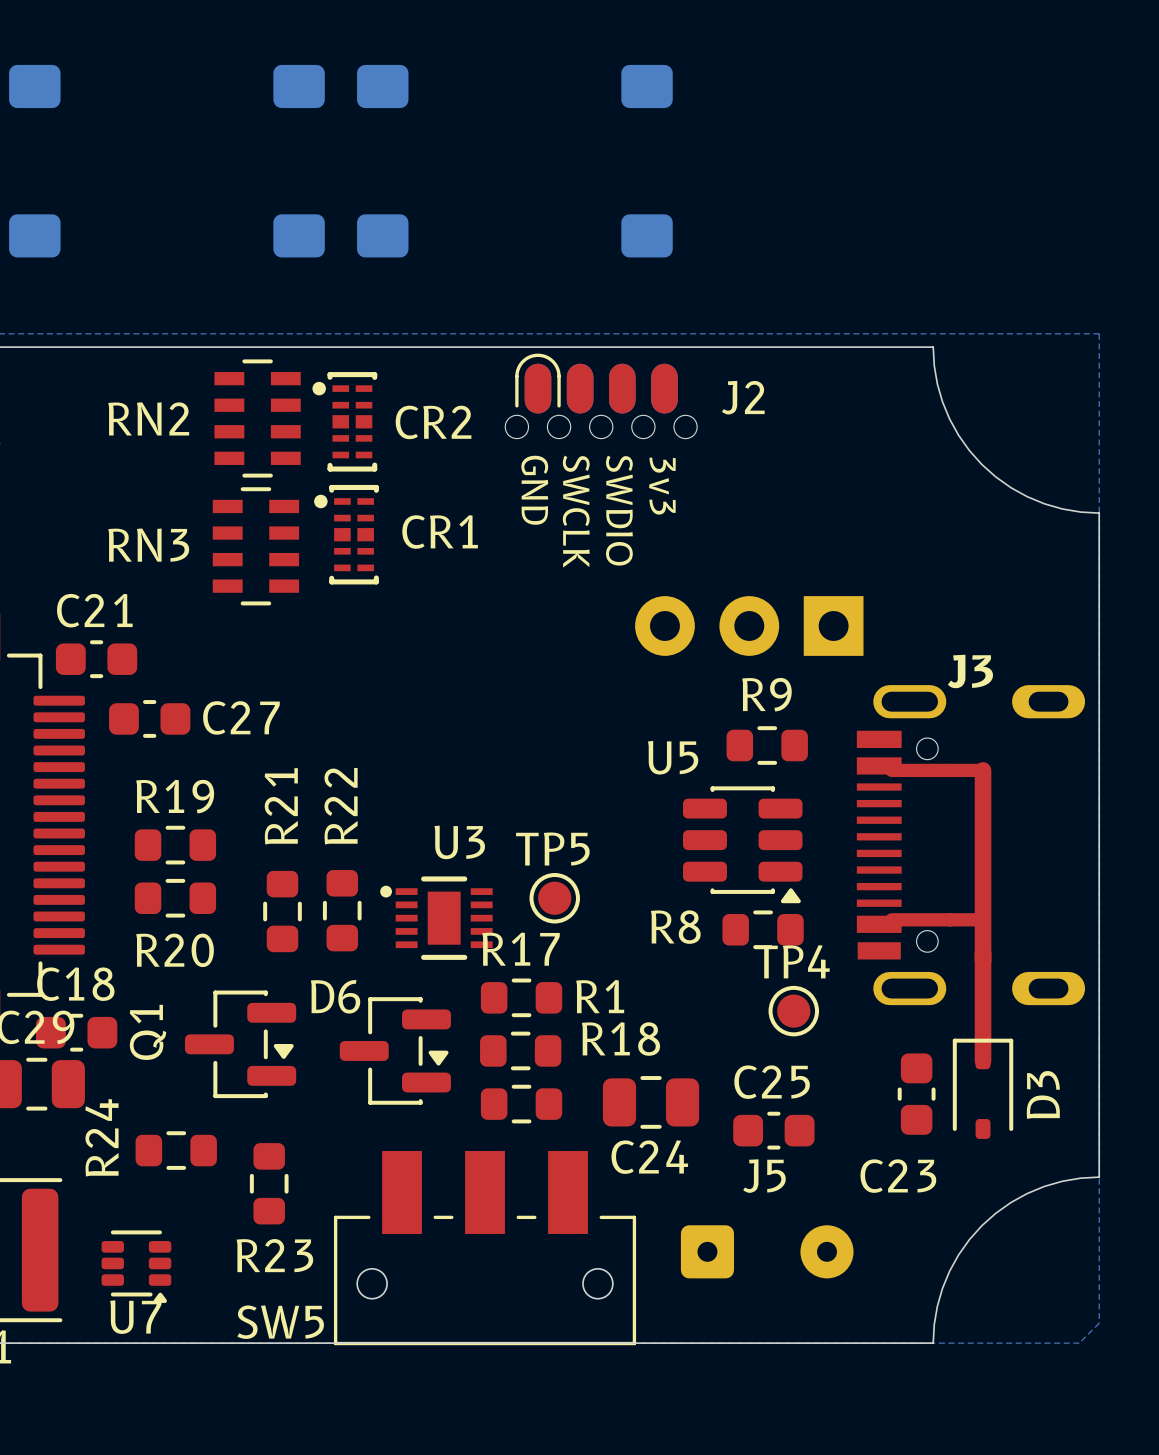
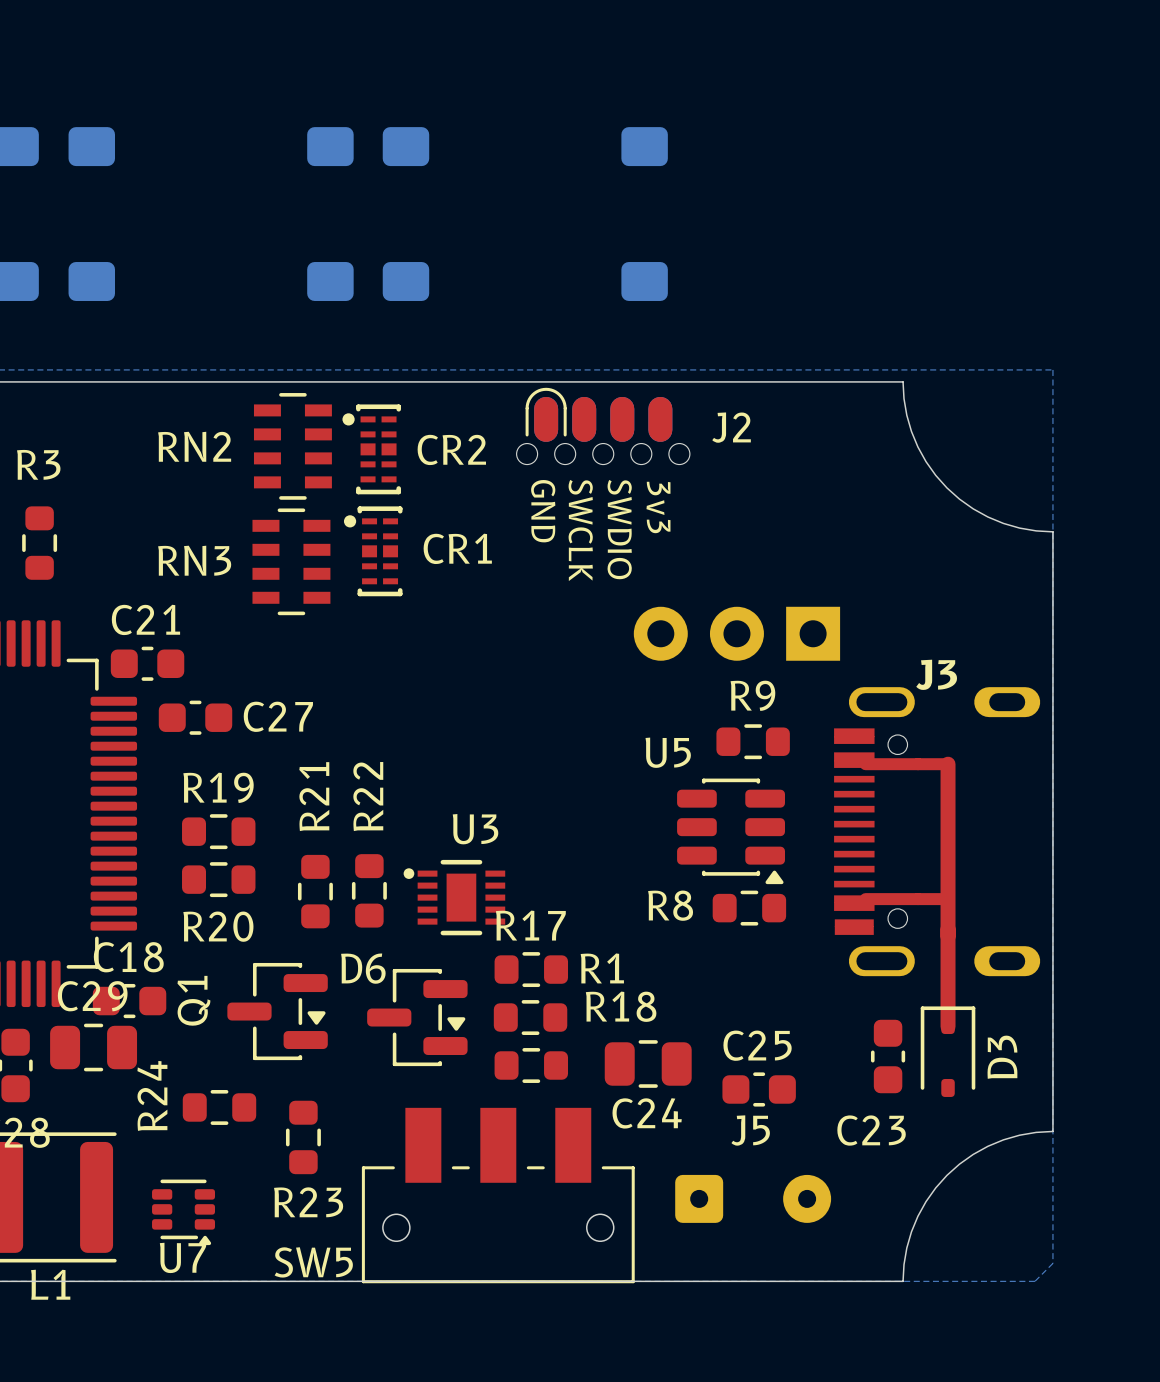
TP5: (554, 898) -> none
TP4: (793, 1011) -> none

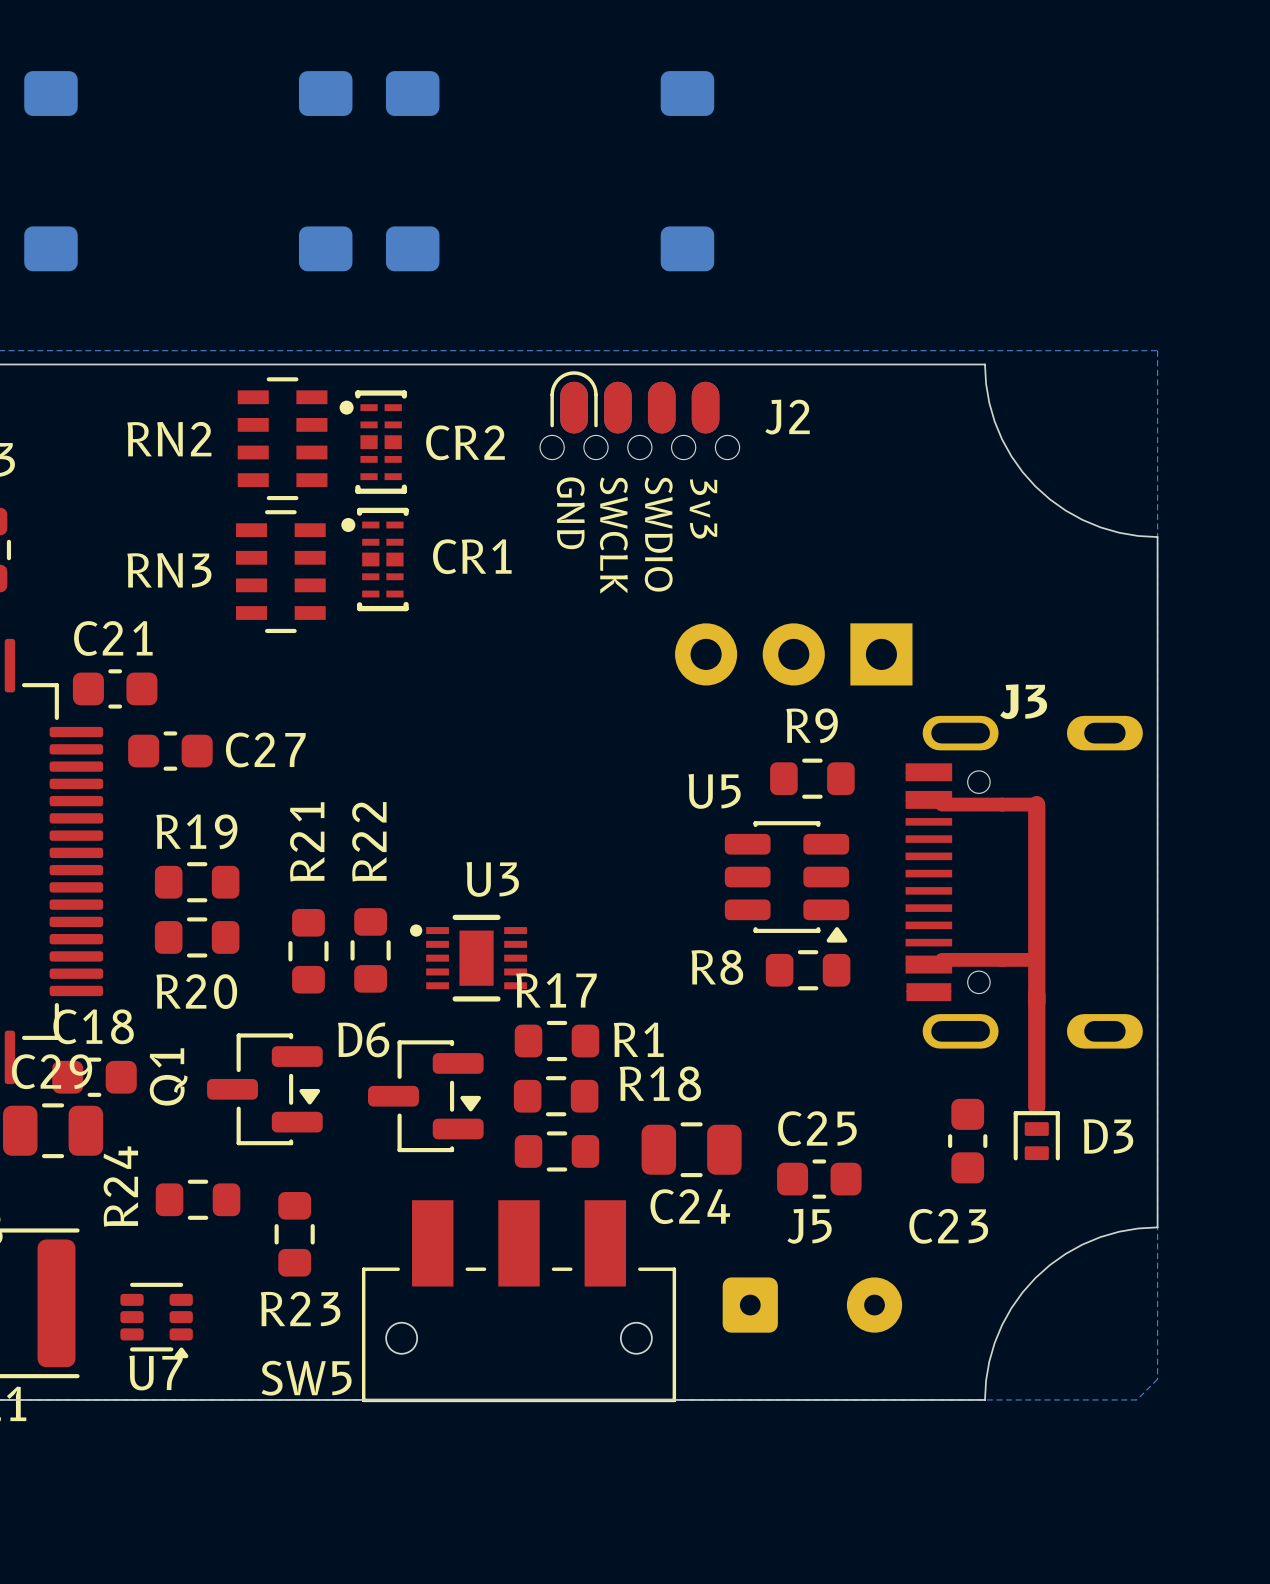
D3 footprint: [920, 1006, 976, 1097] -> [1013, 1111, 1060, 1161]
D3 name rotation: 0° (1002, 1057) -> 90° clockwise (1108, 1136)

